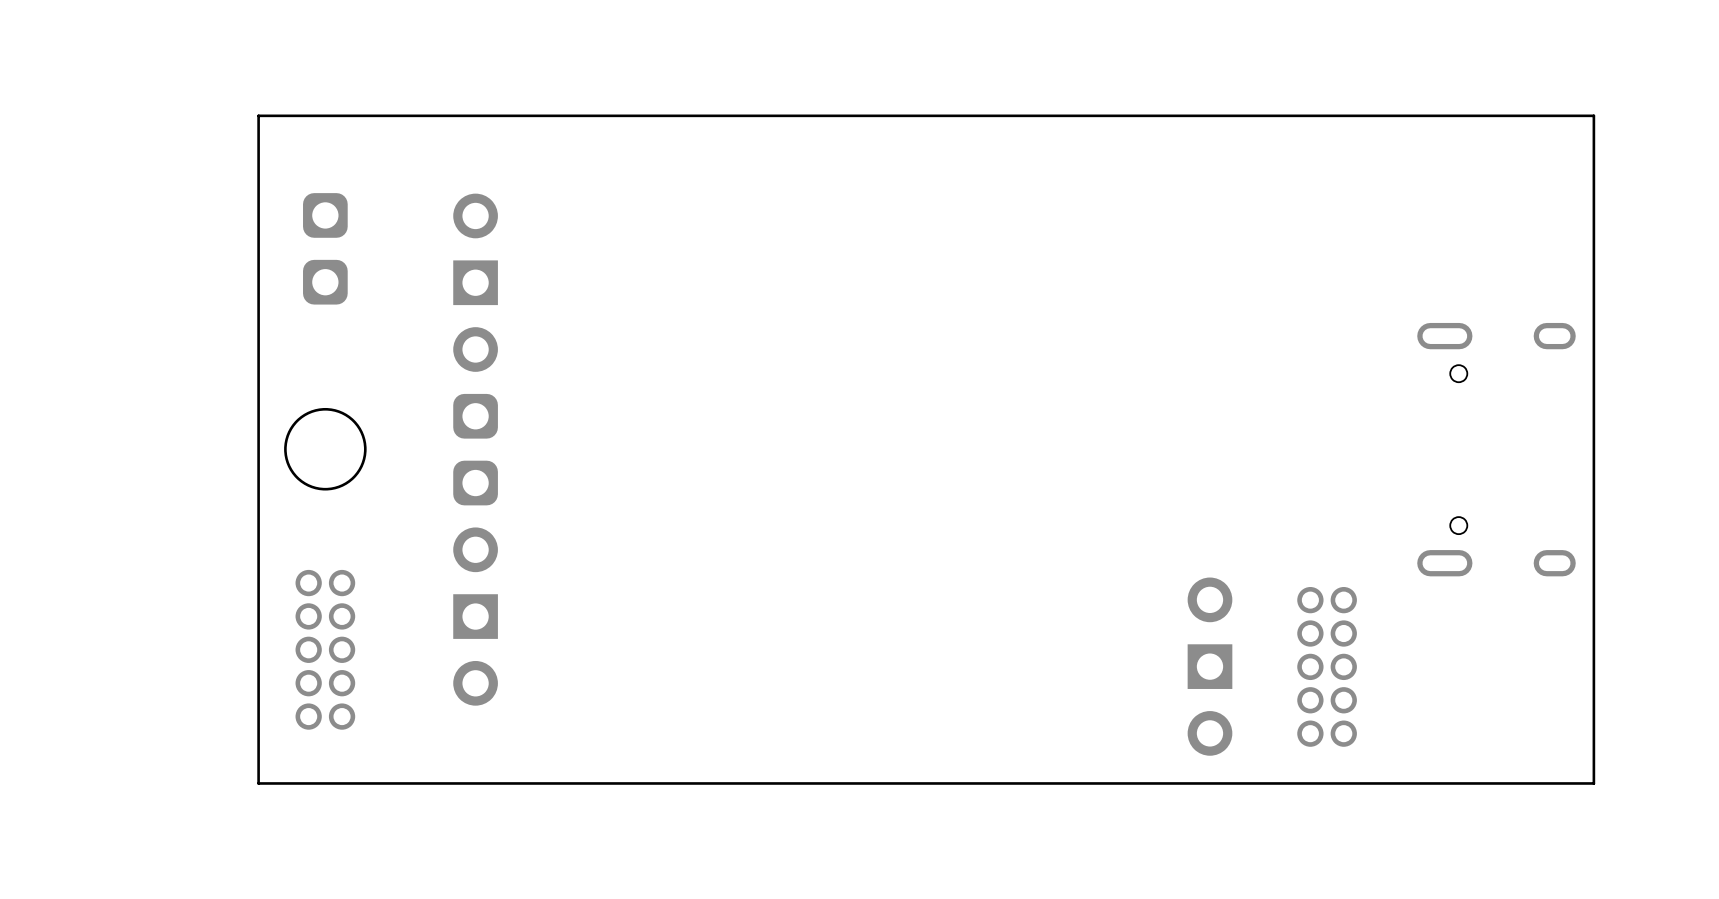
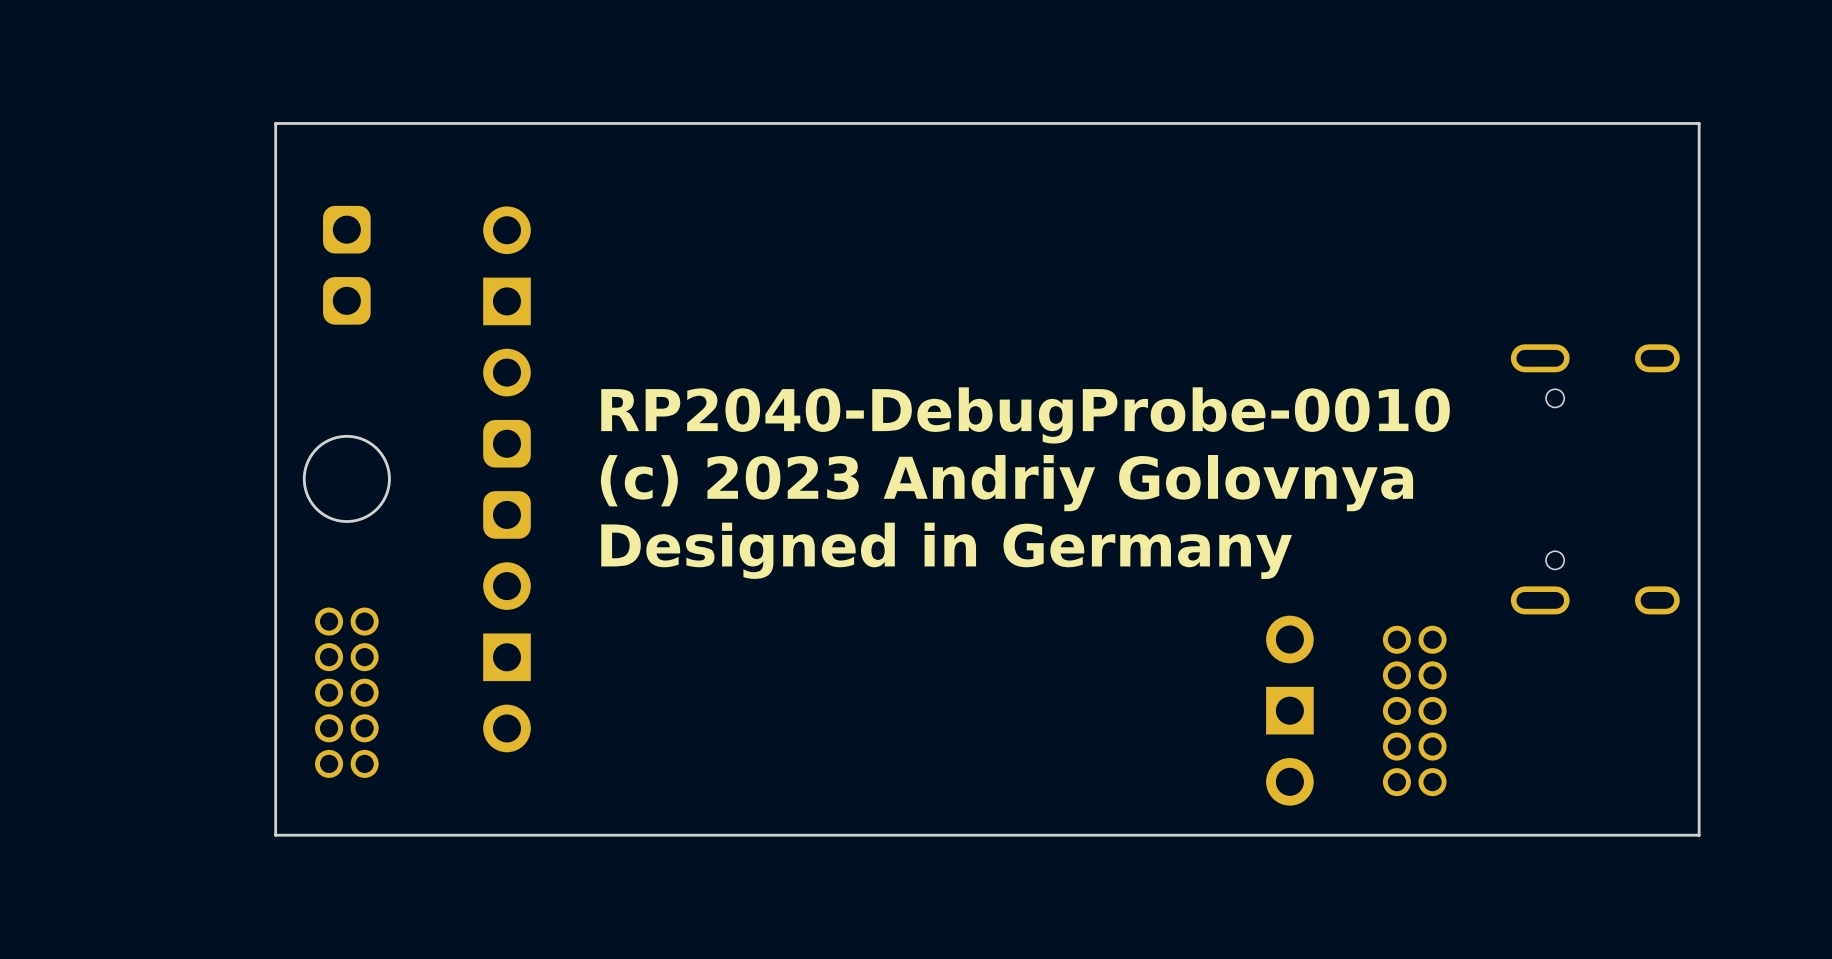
text: none -> RP2040-DebugProbe-0010 (1025, 415)
text: none -> (c) 2023 Andriy Golovnya (1006, 483)
text: none -> Designed in Germany (946, 550)

